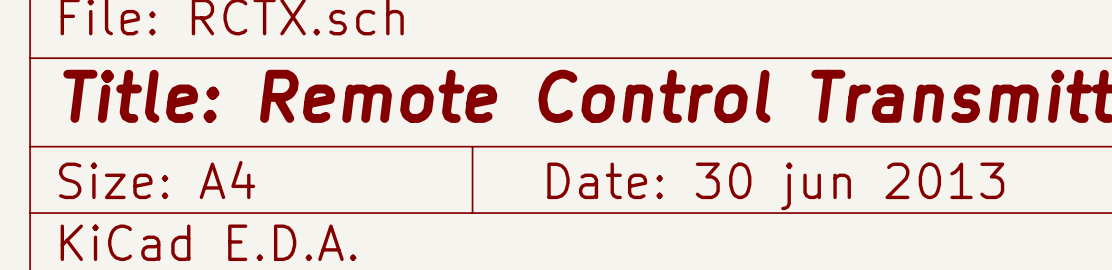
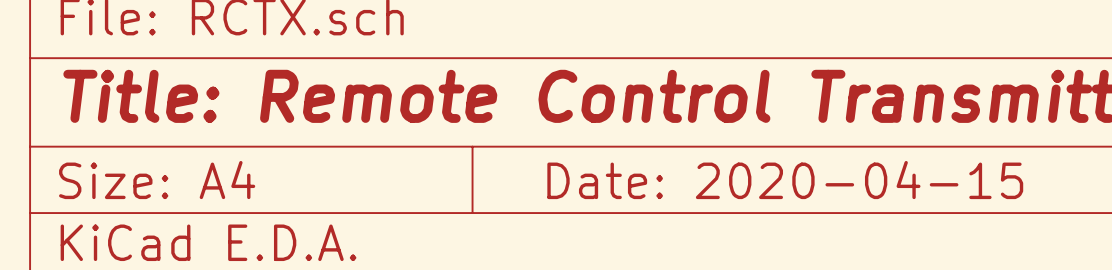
title block: Date: 30 jun 2013 (775, 186) -> Date: 2020-04-15 (785, 180)

